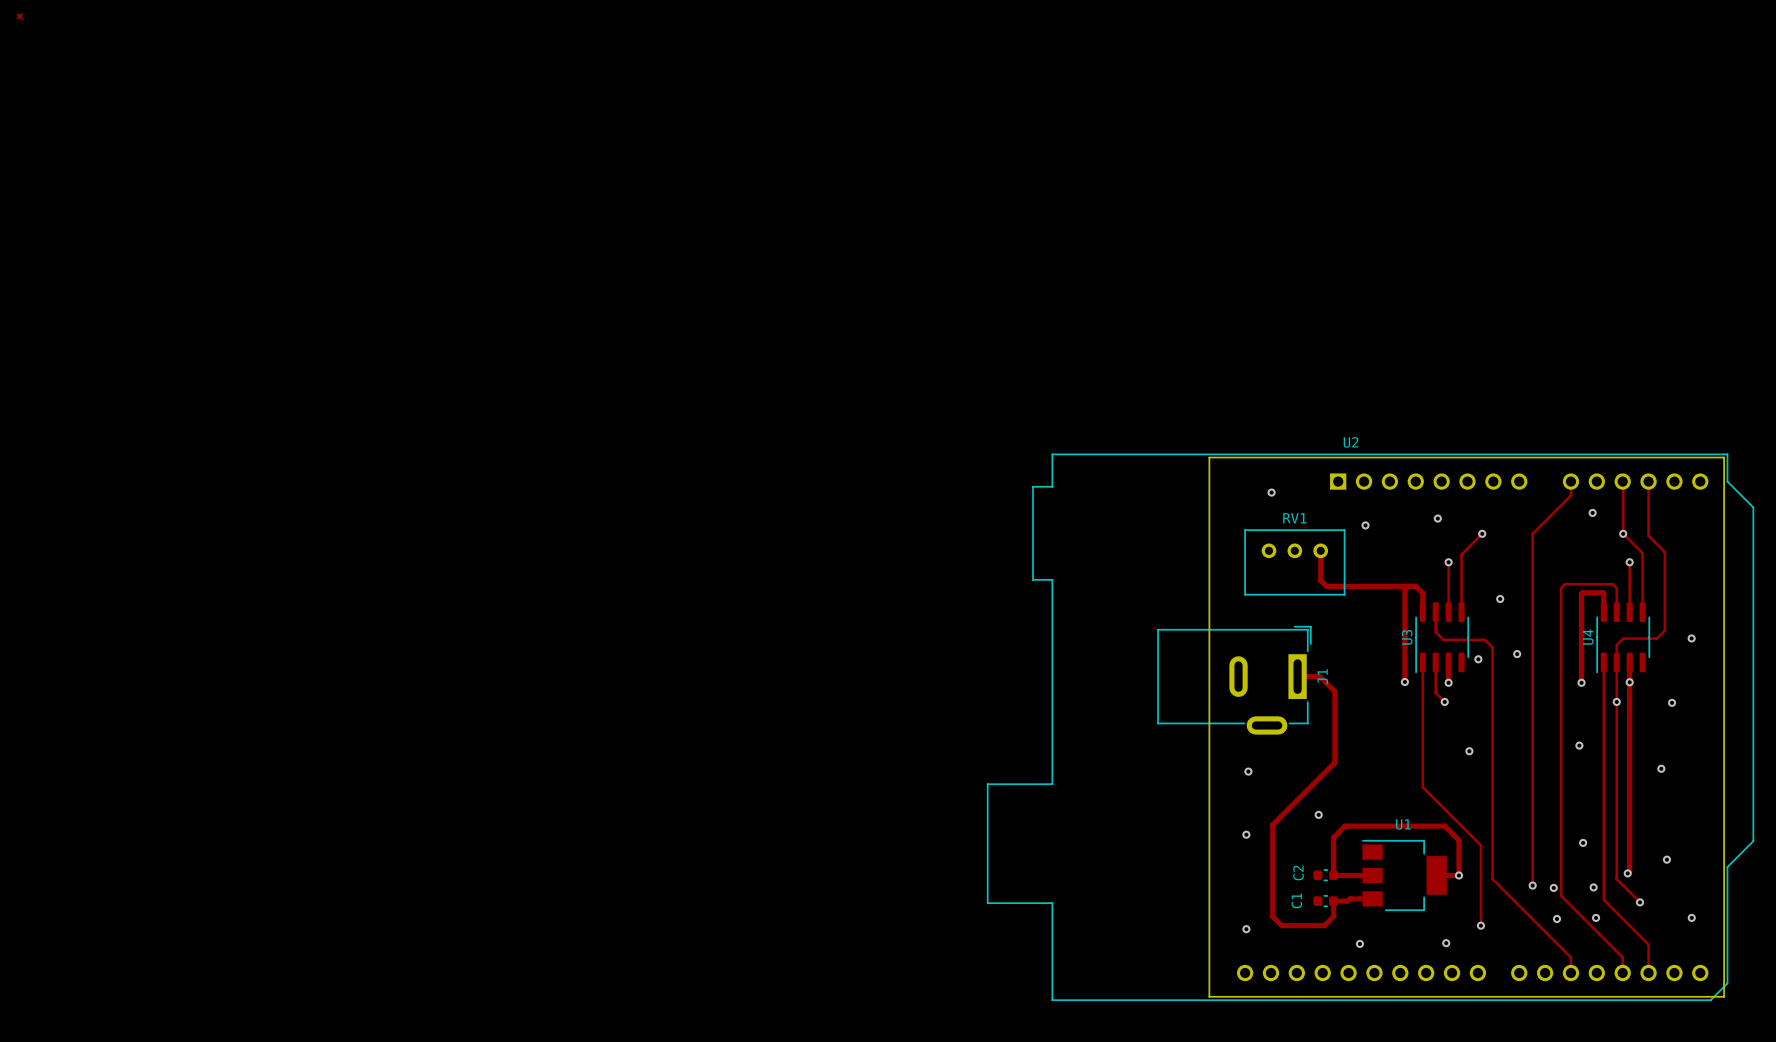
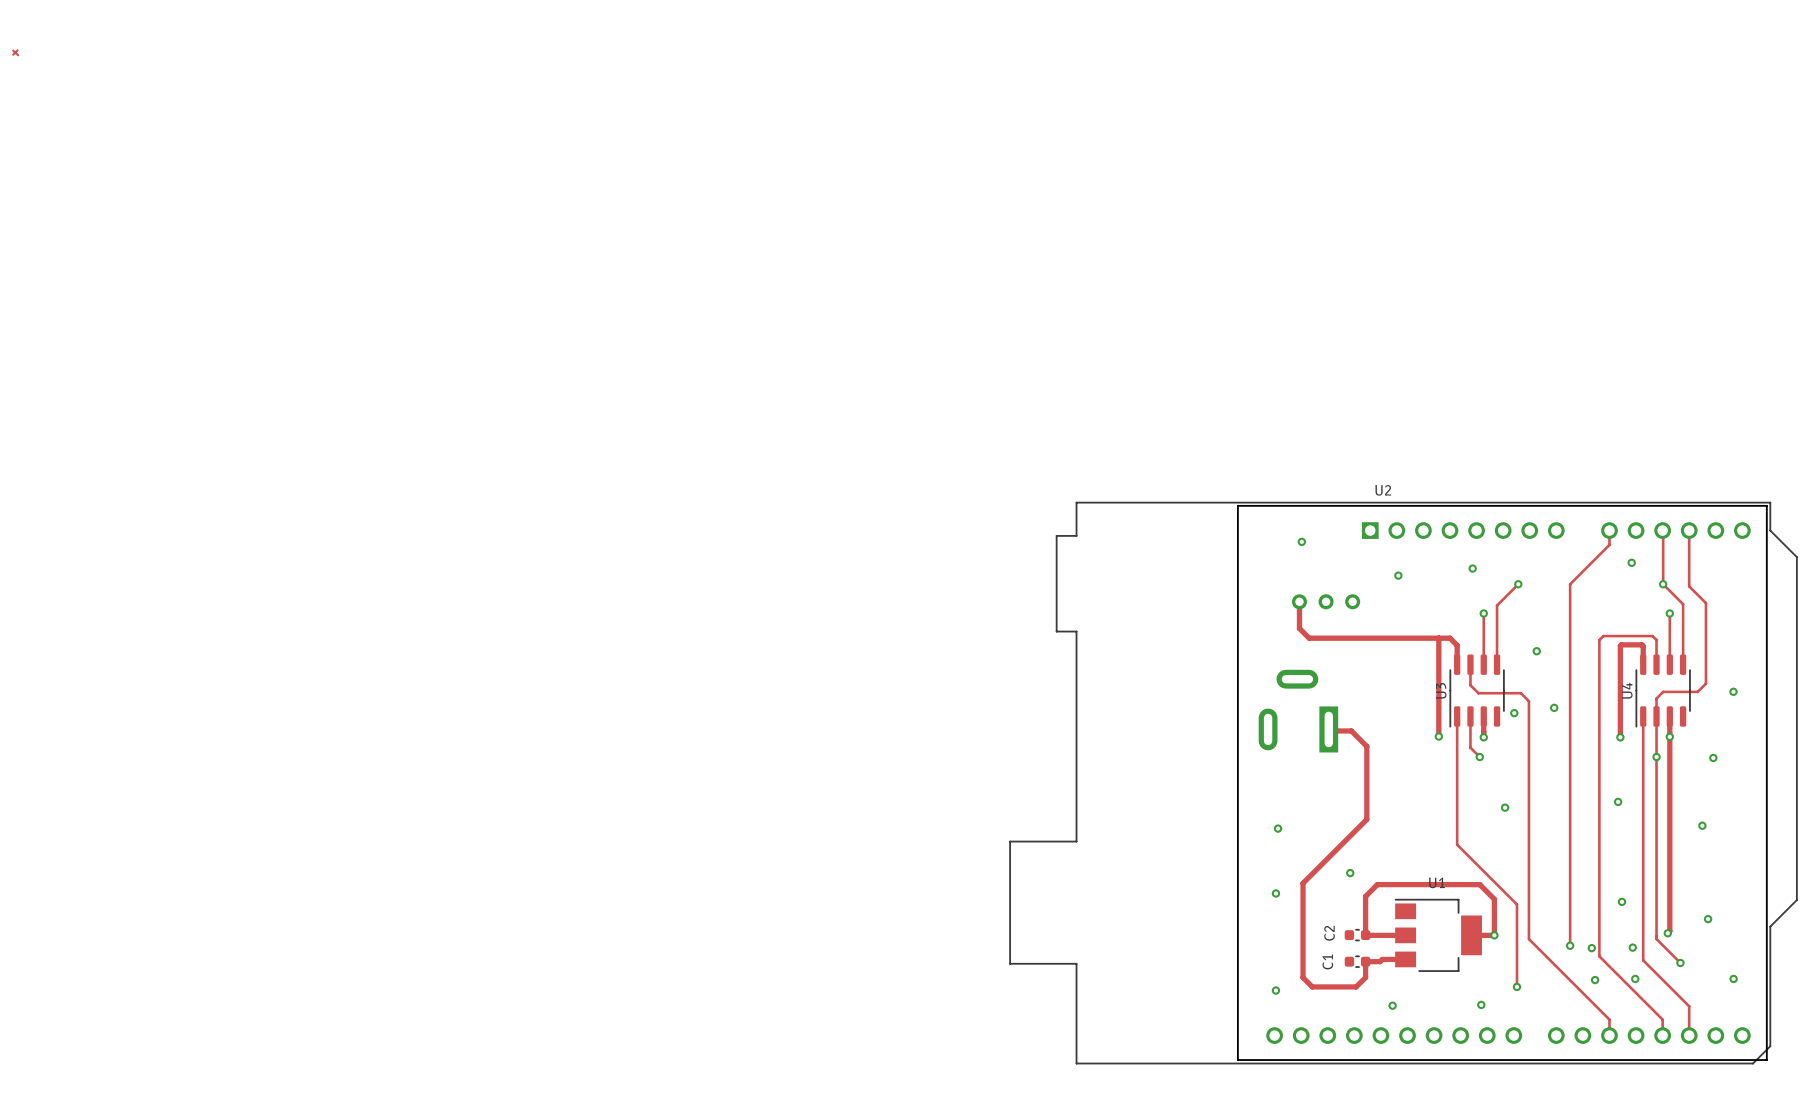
track: (1320, 550) (1320, 580) (1326, 586) -> (1299, 601) (1299, 628) (1309, 638) (1358, 638)
RV1 side: top (1294, 562) -> bottom (1326, 601)
J1 side: top (1234, 680) -> bottom (1298, 711)

